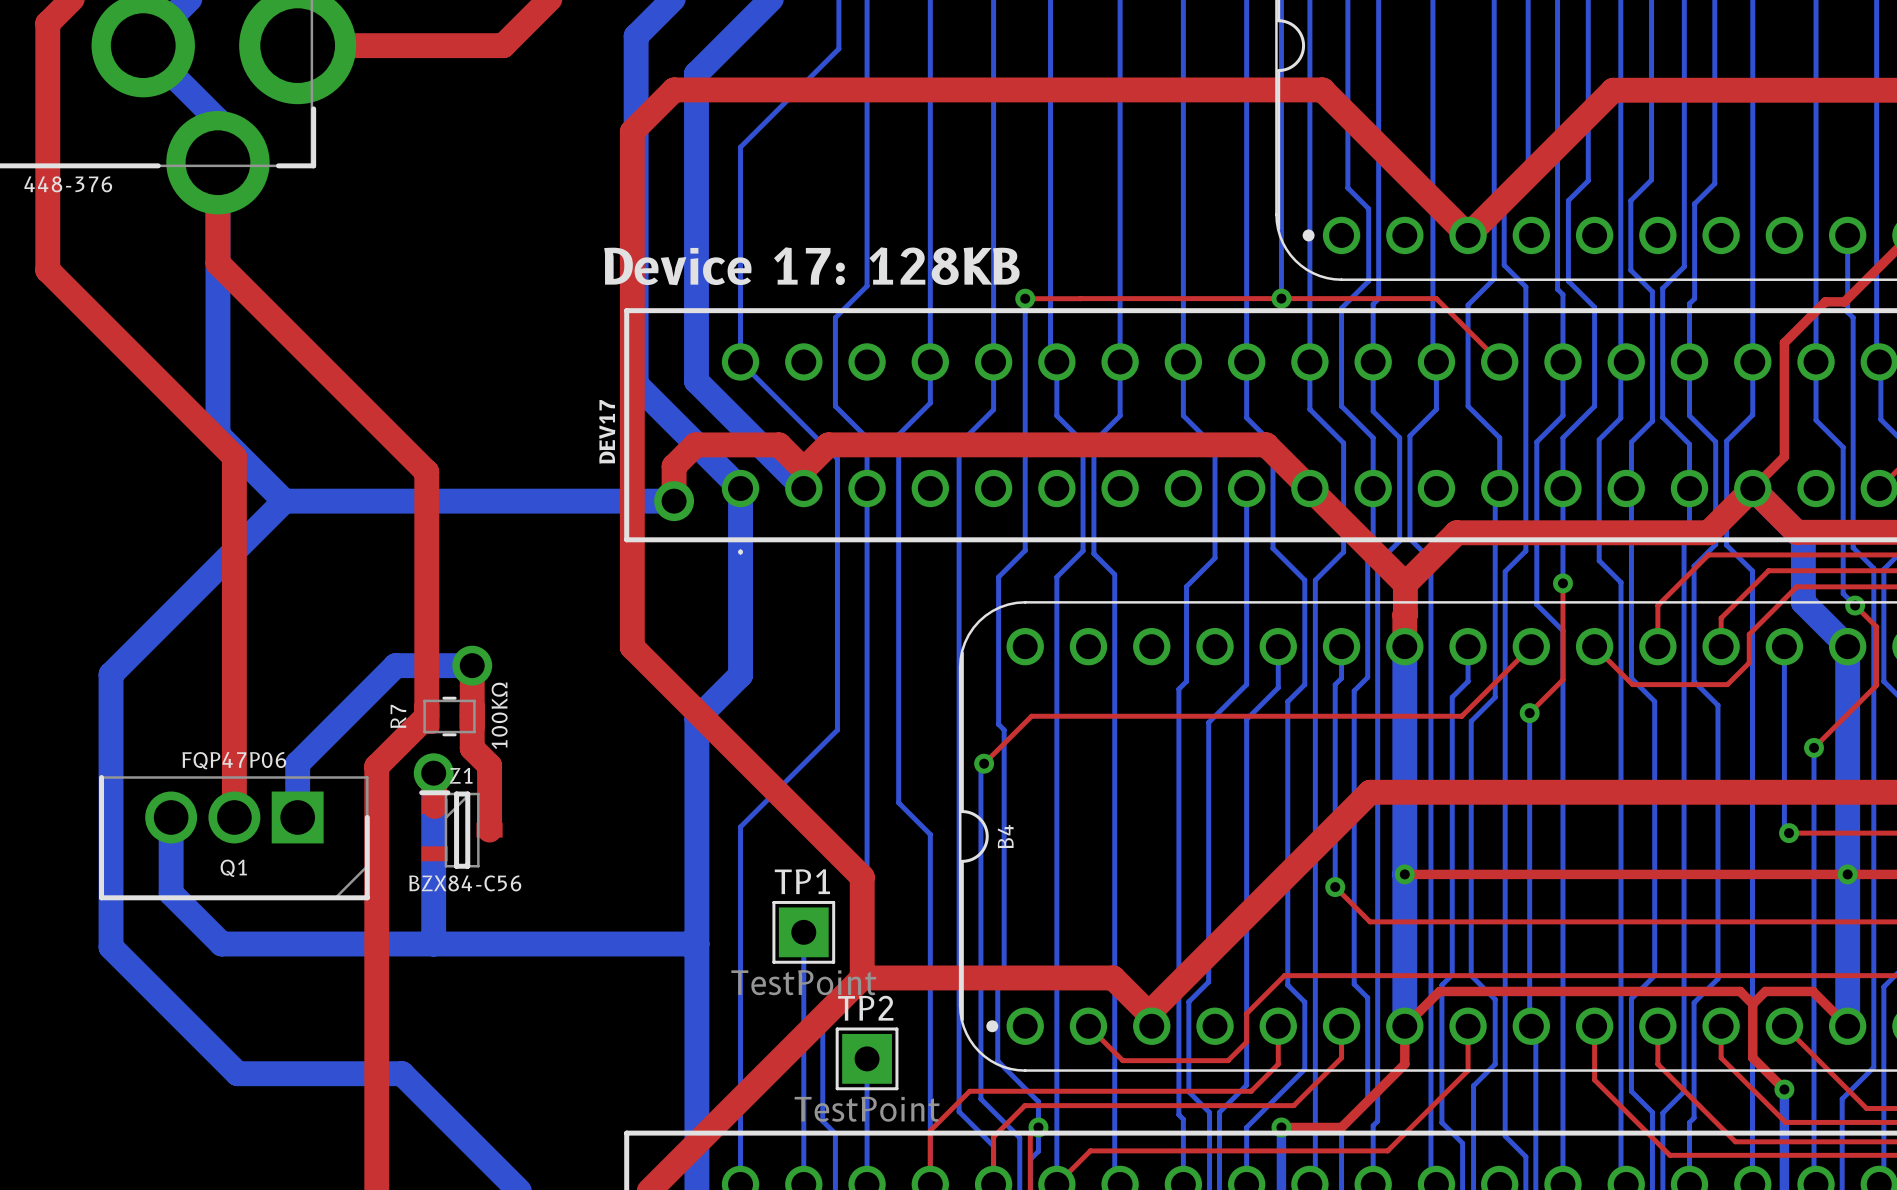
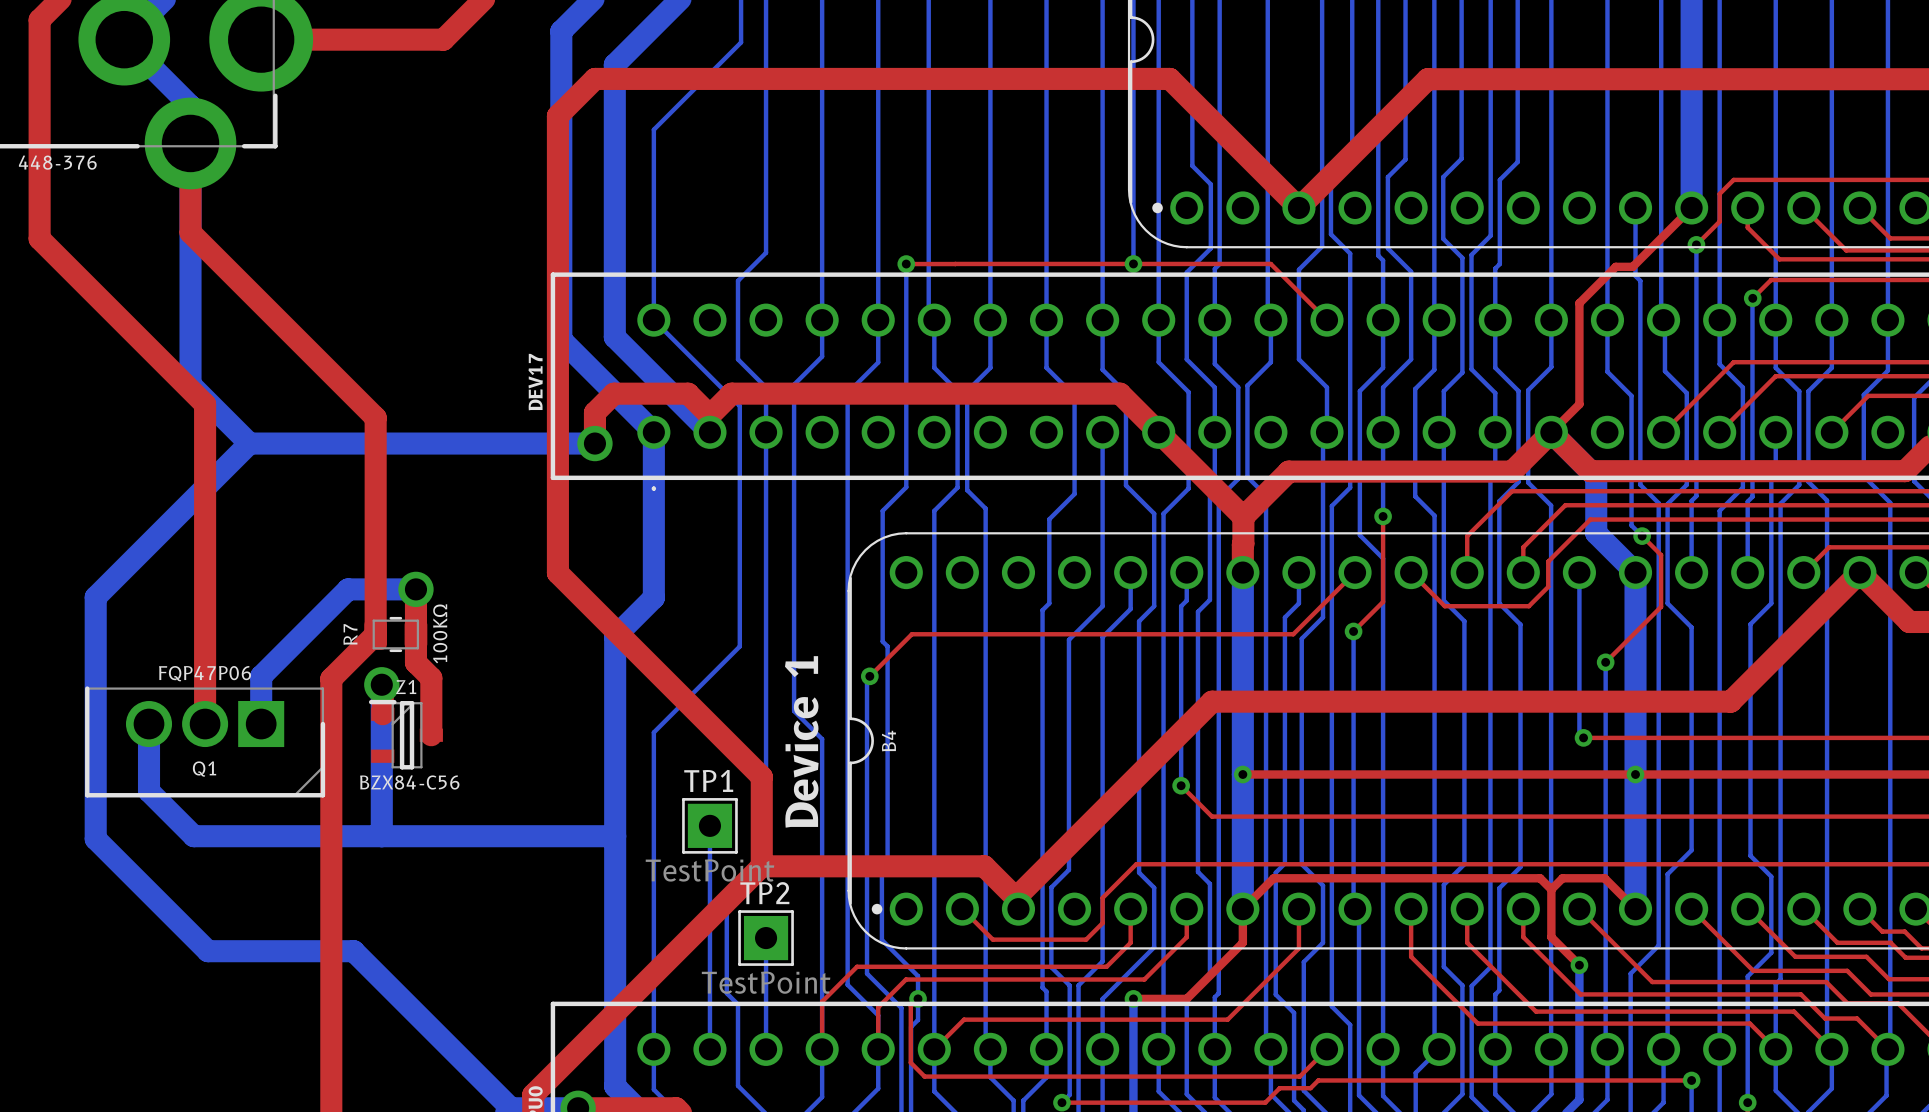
text: Device 17: 128KB (811, 266) -> none
text: none -> Device 1 (801, 741)

